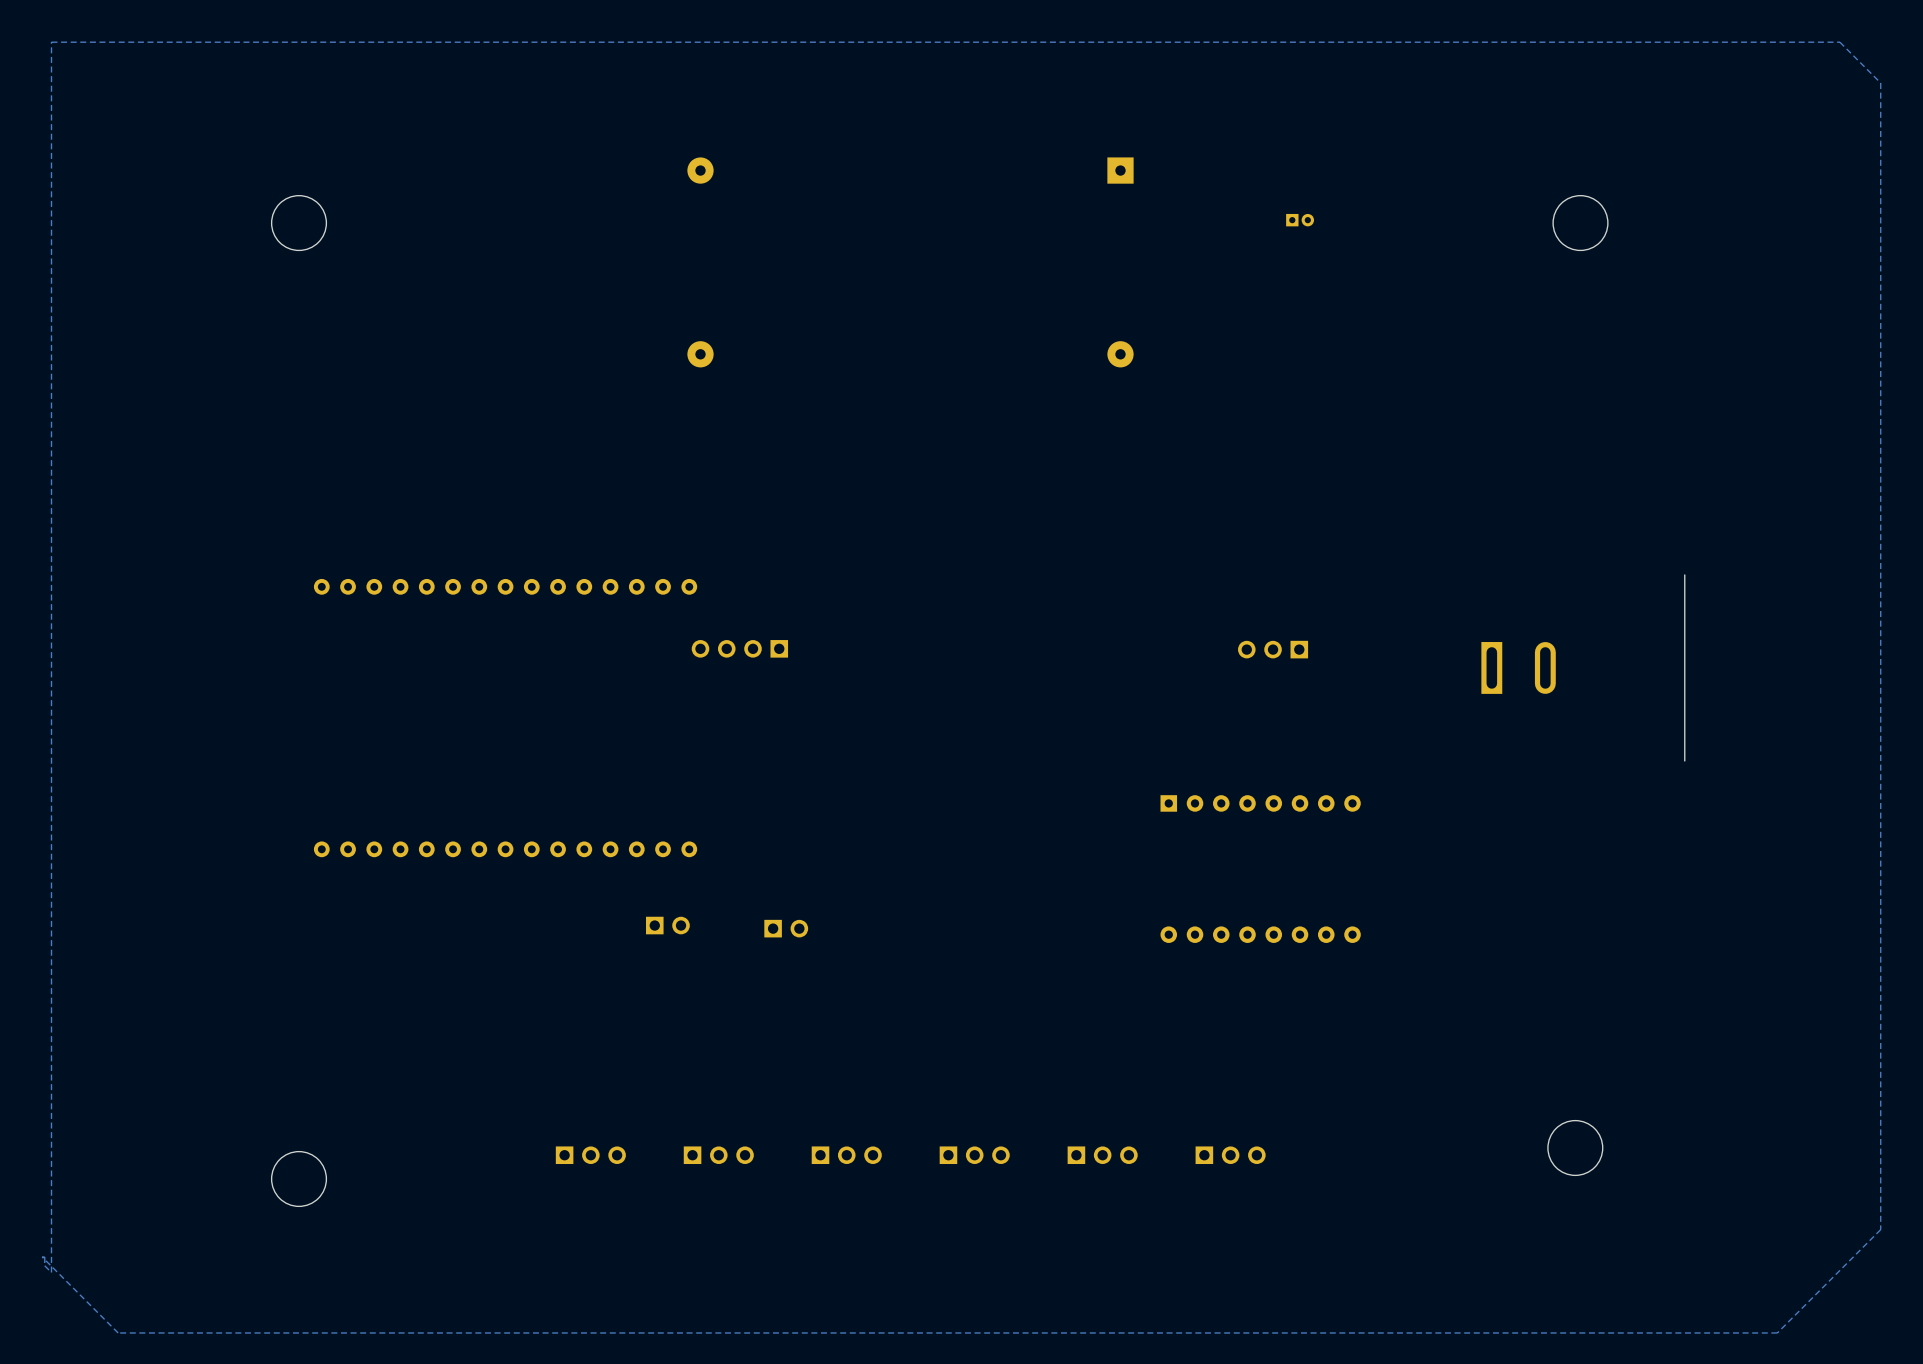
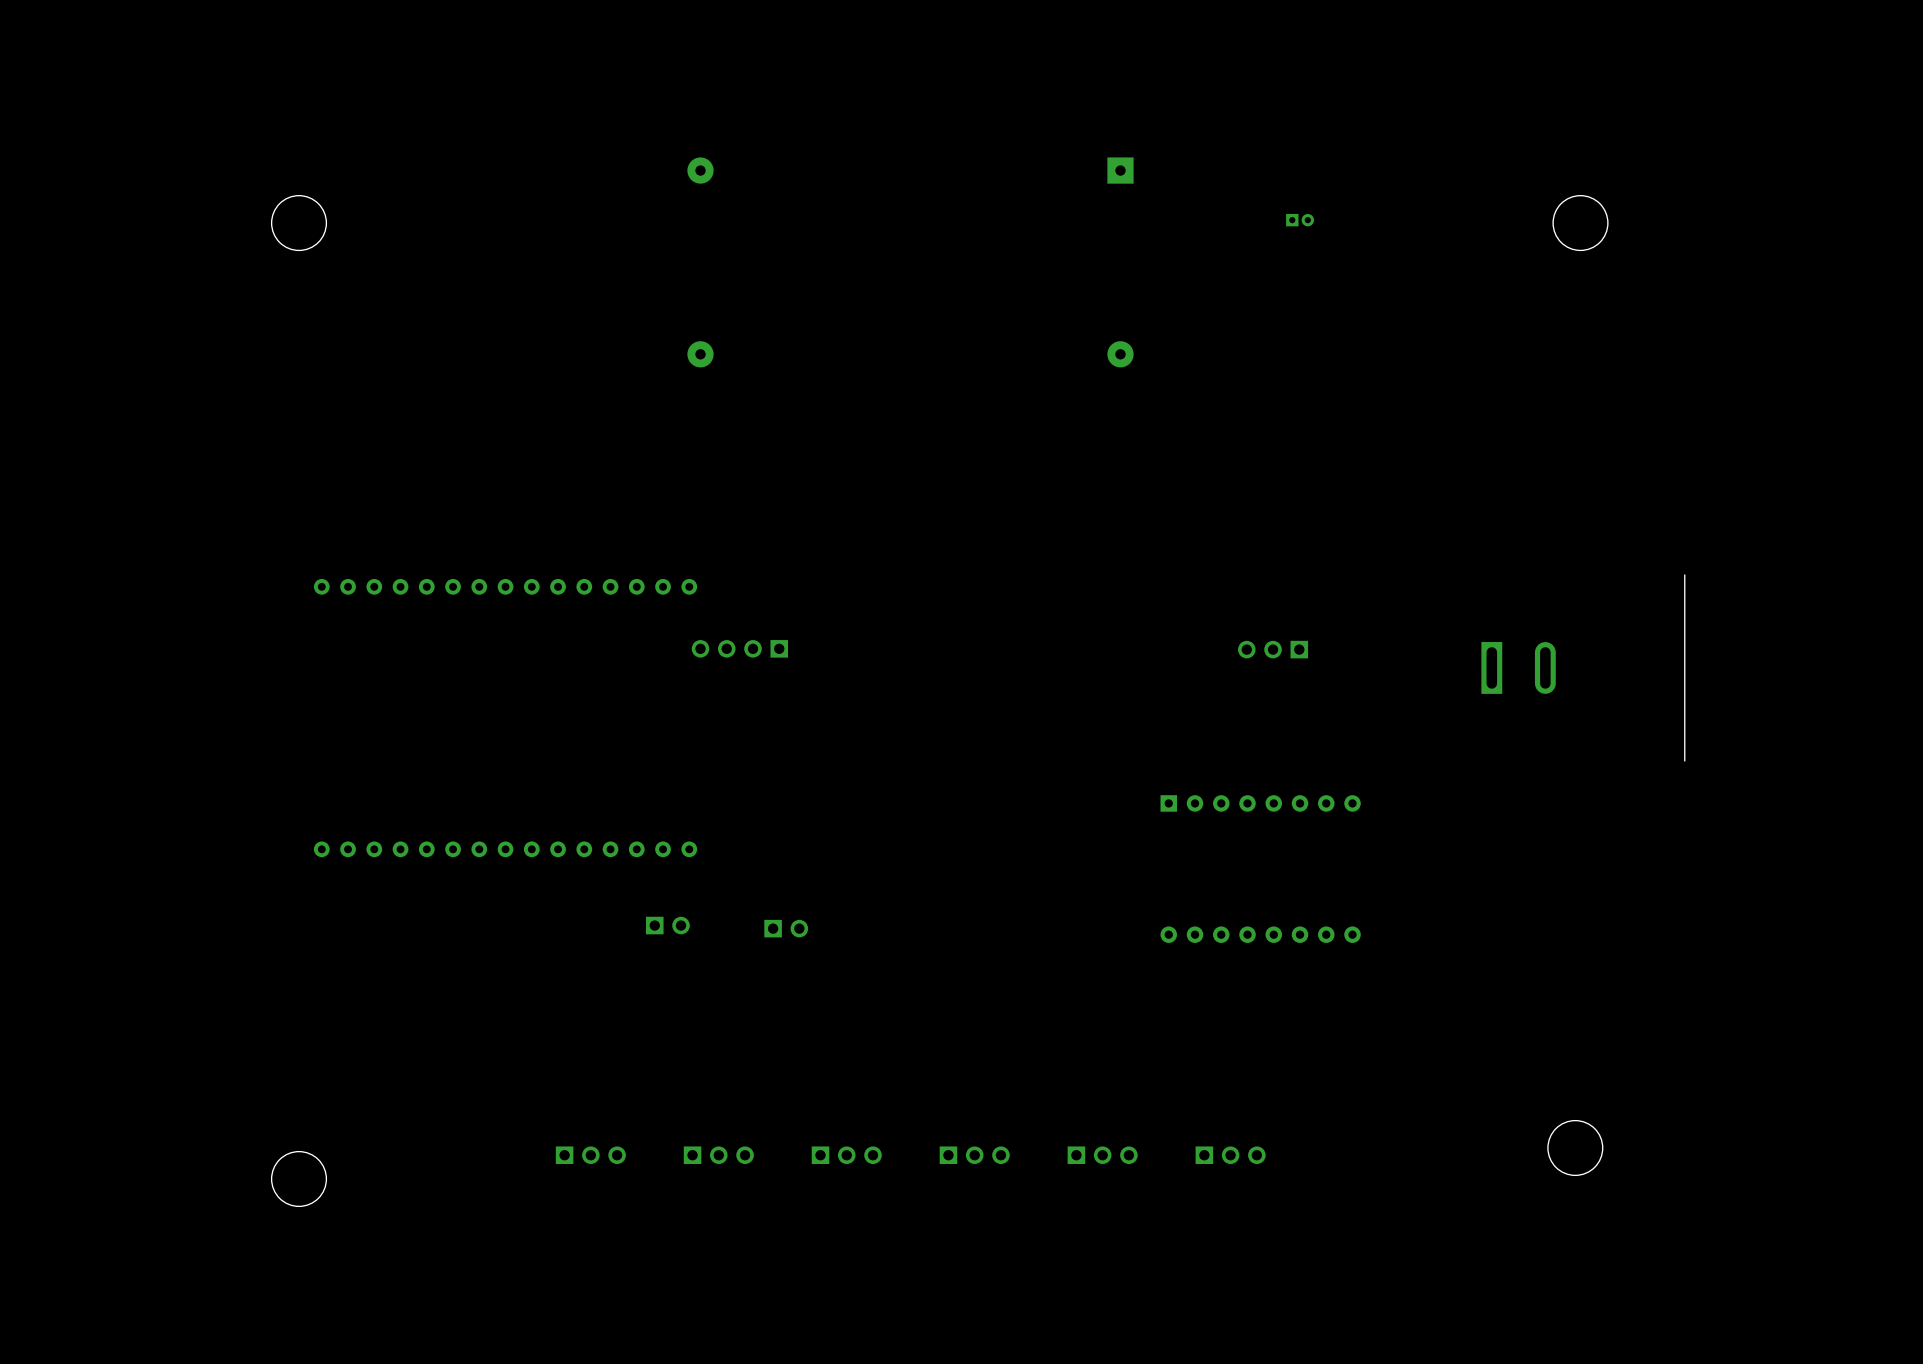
zone outline: (1839, 42) (51, 42) (51, 1272) (44, 1265) (44, 1257) (42, 1257) (118, 1332) (1777, 1332) (1880, 1229) (1880, 83) (1839, 42) -> none

